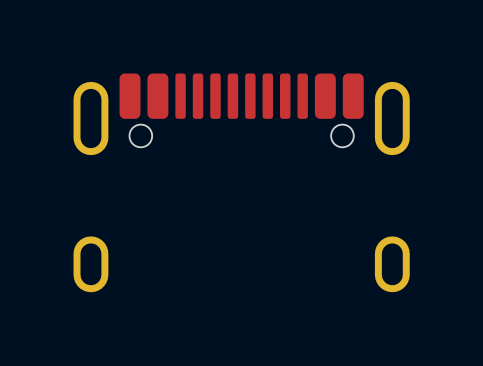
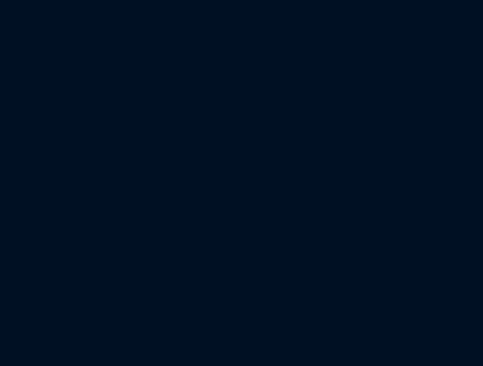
part: (241, 182) -> none

